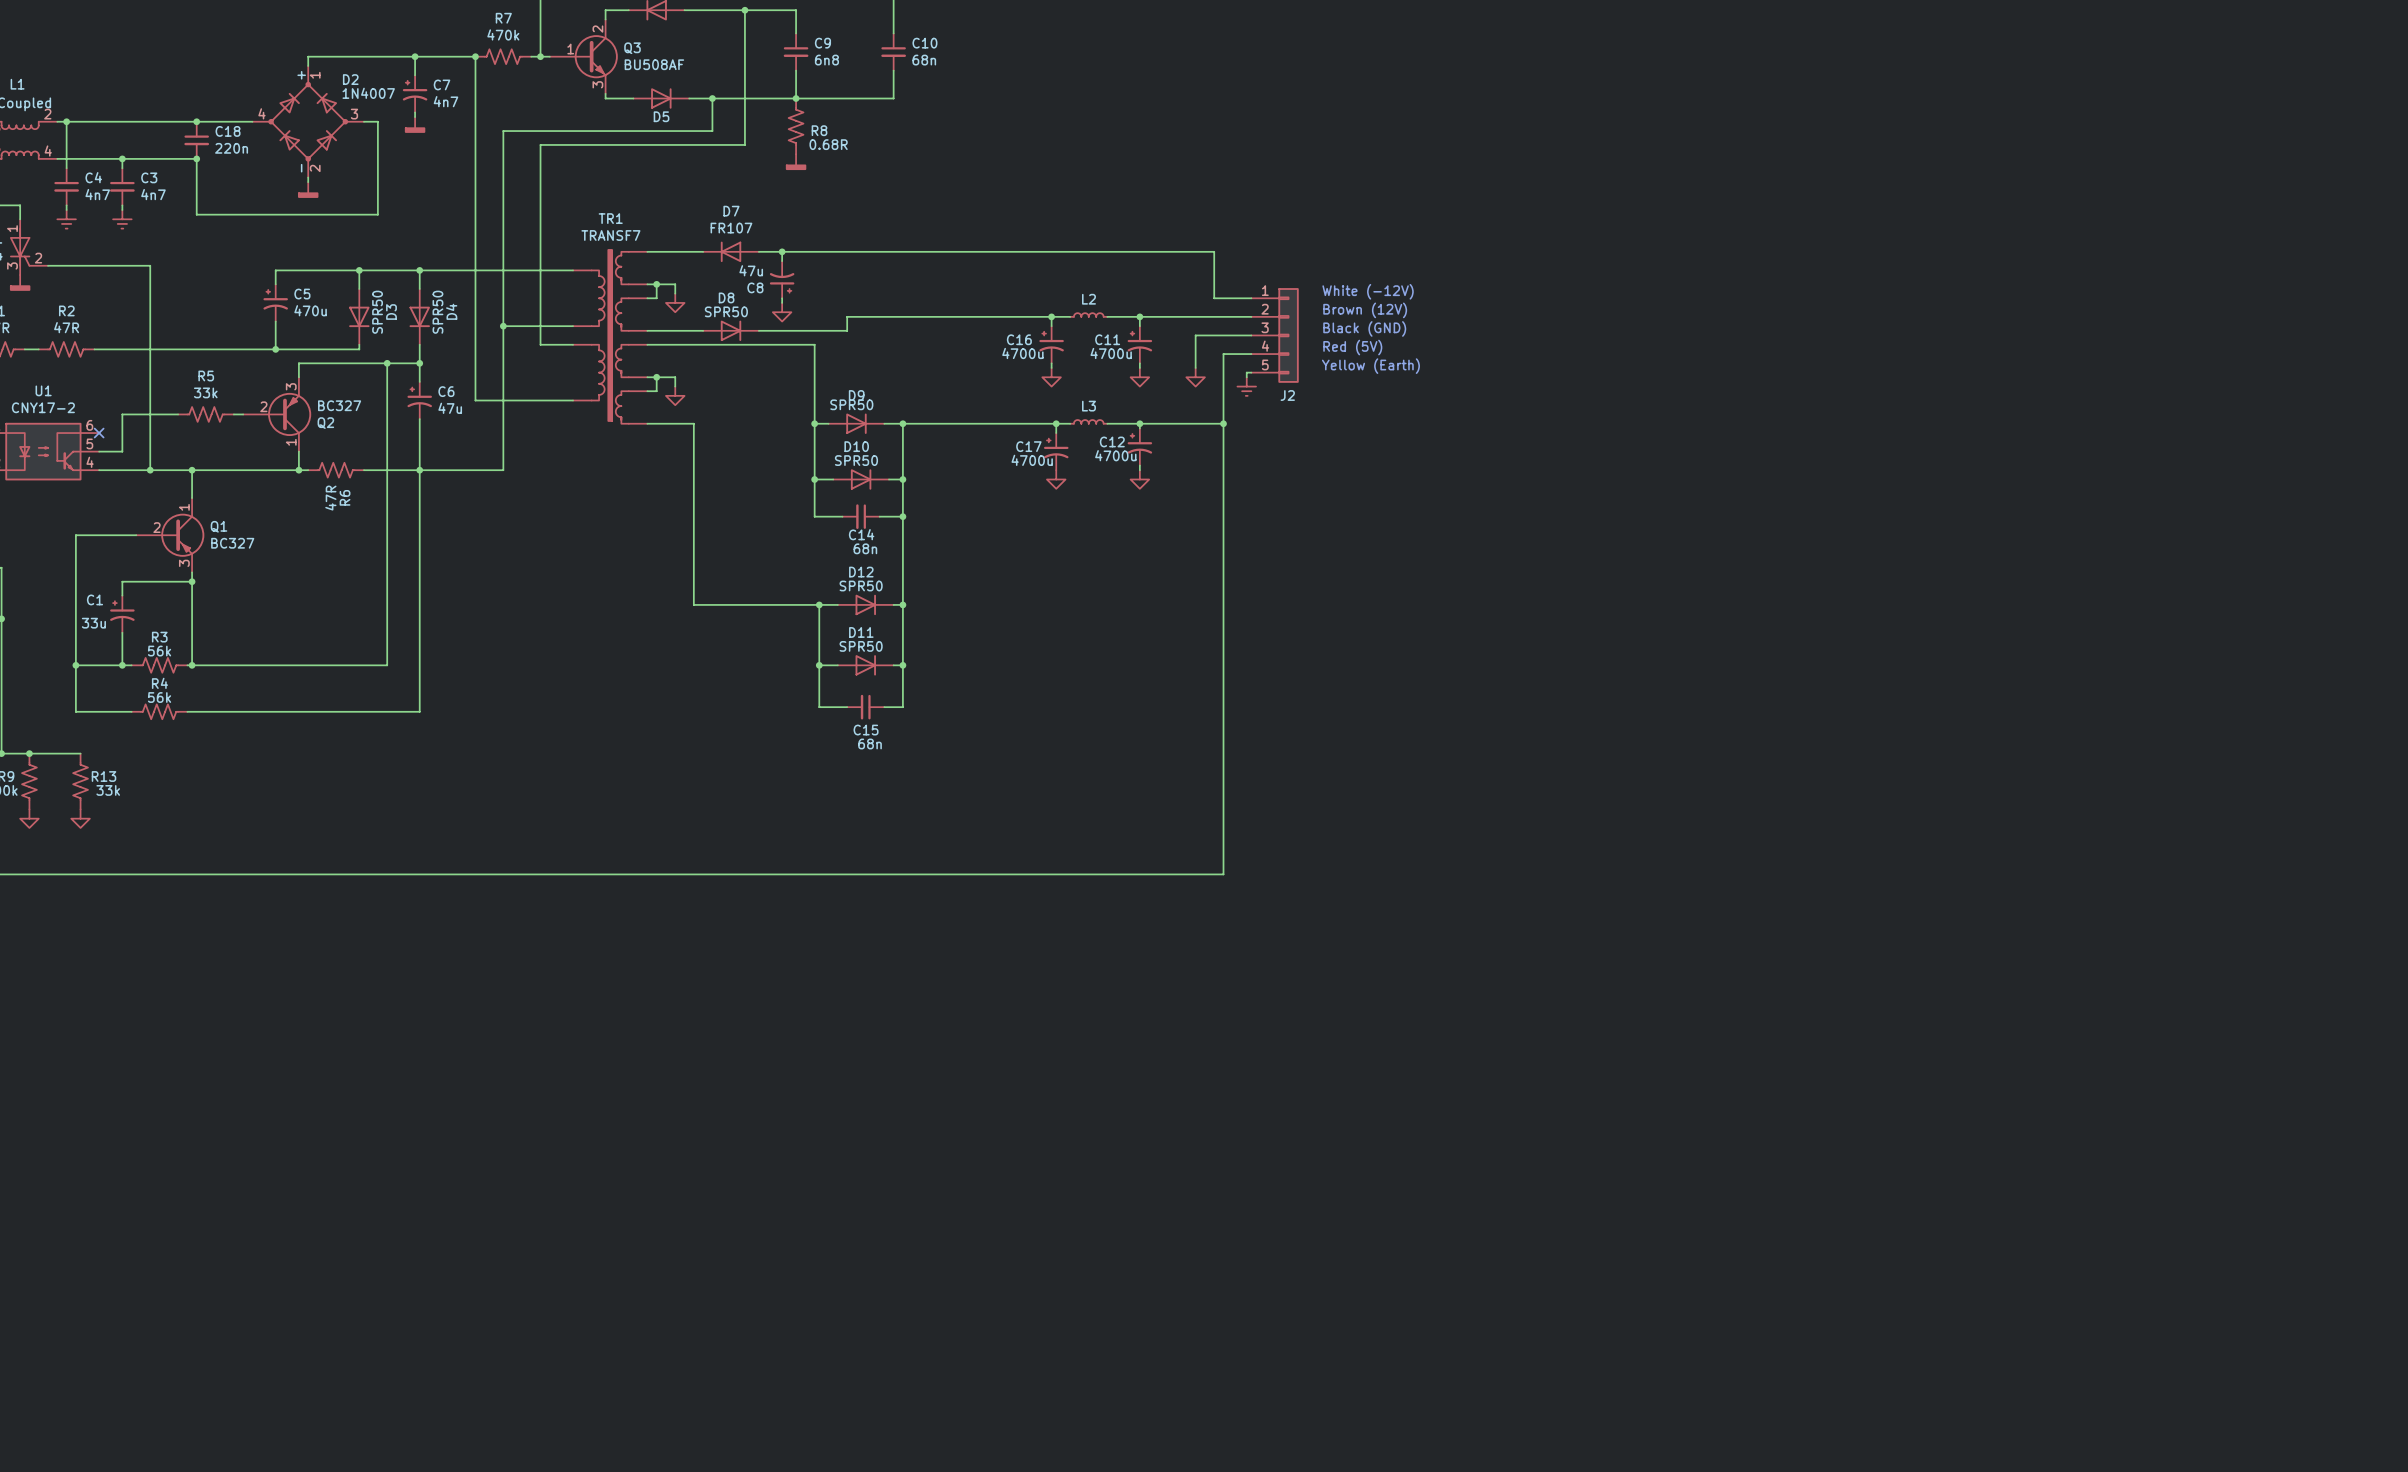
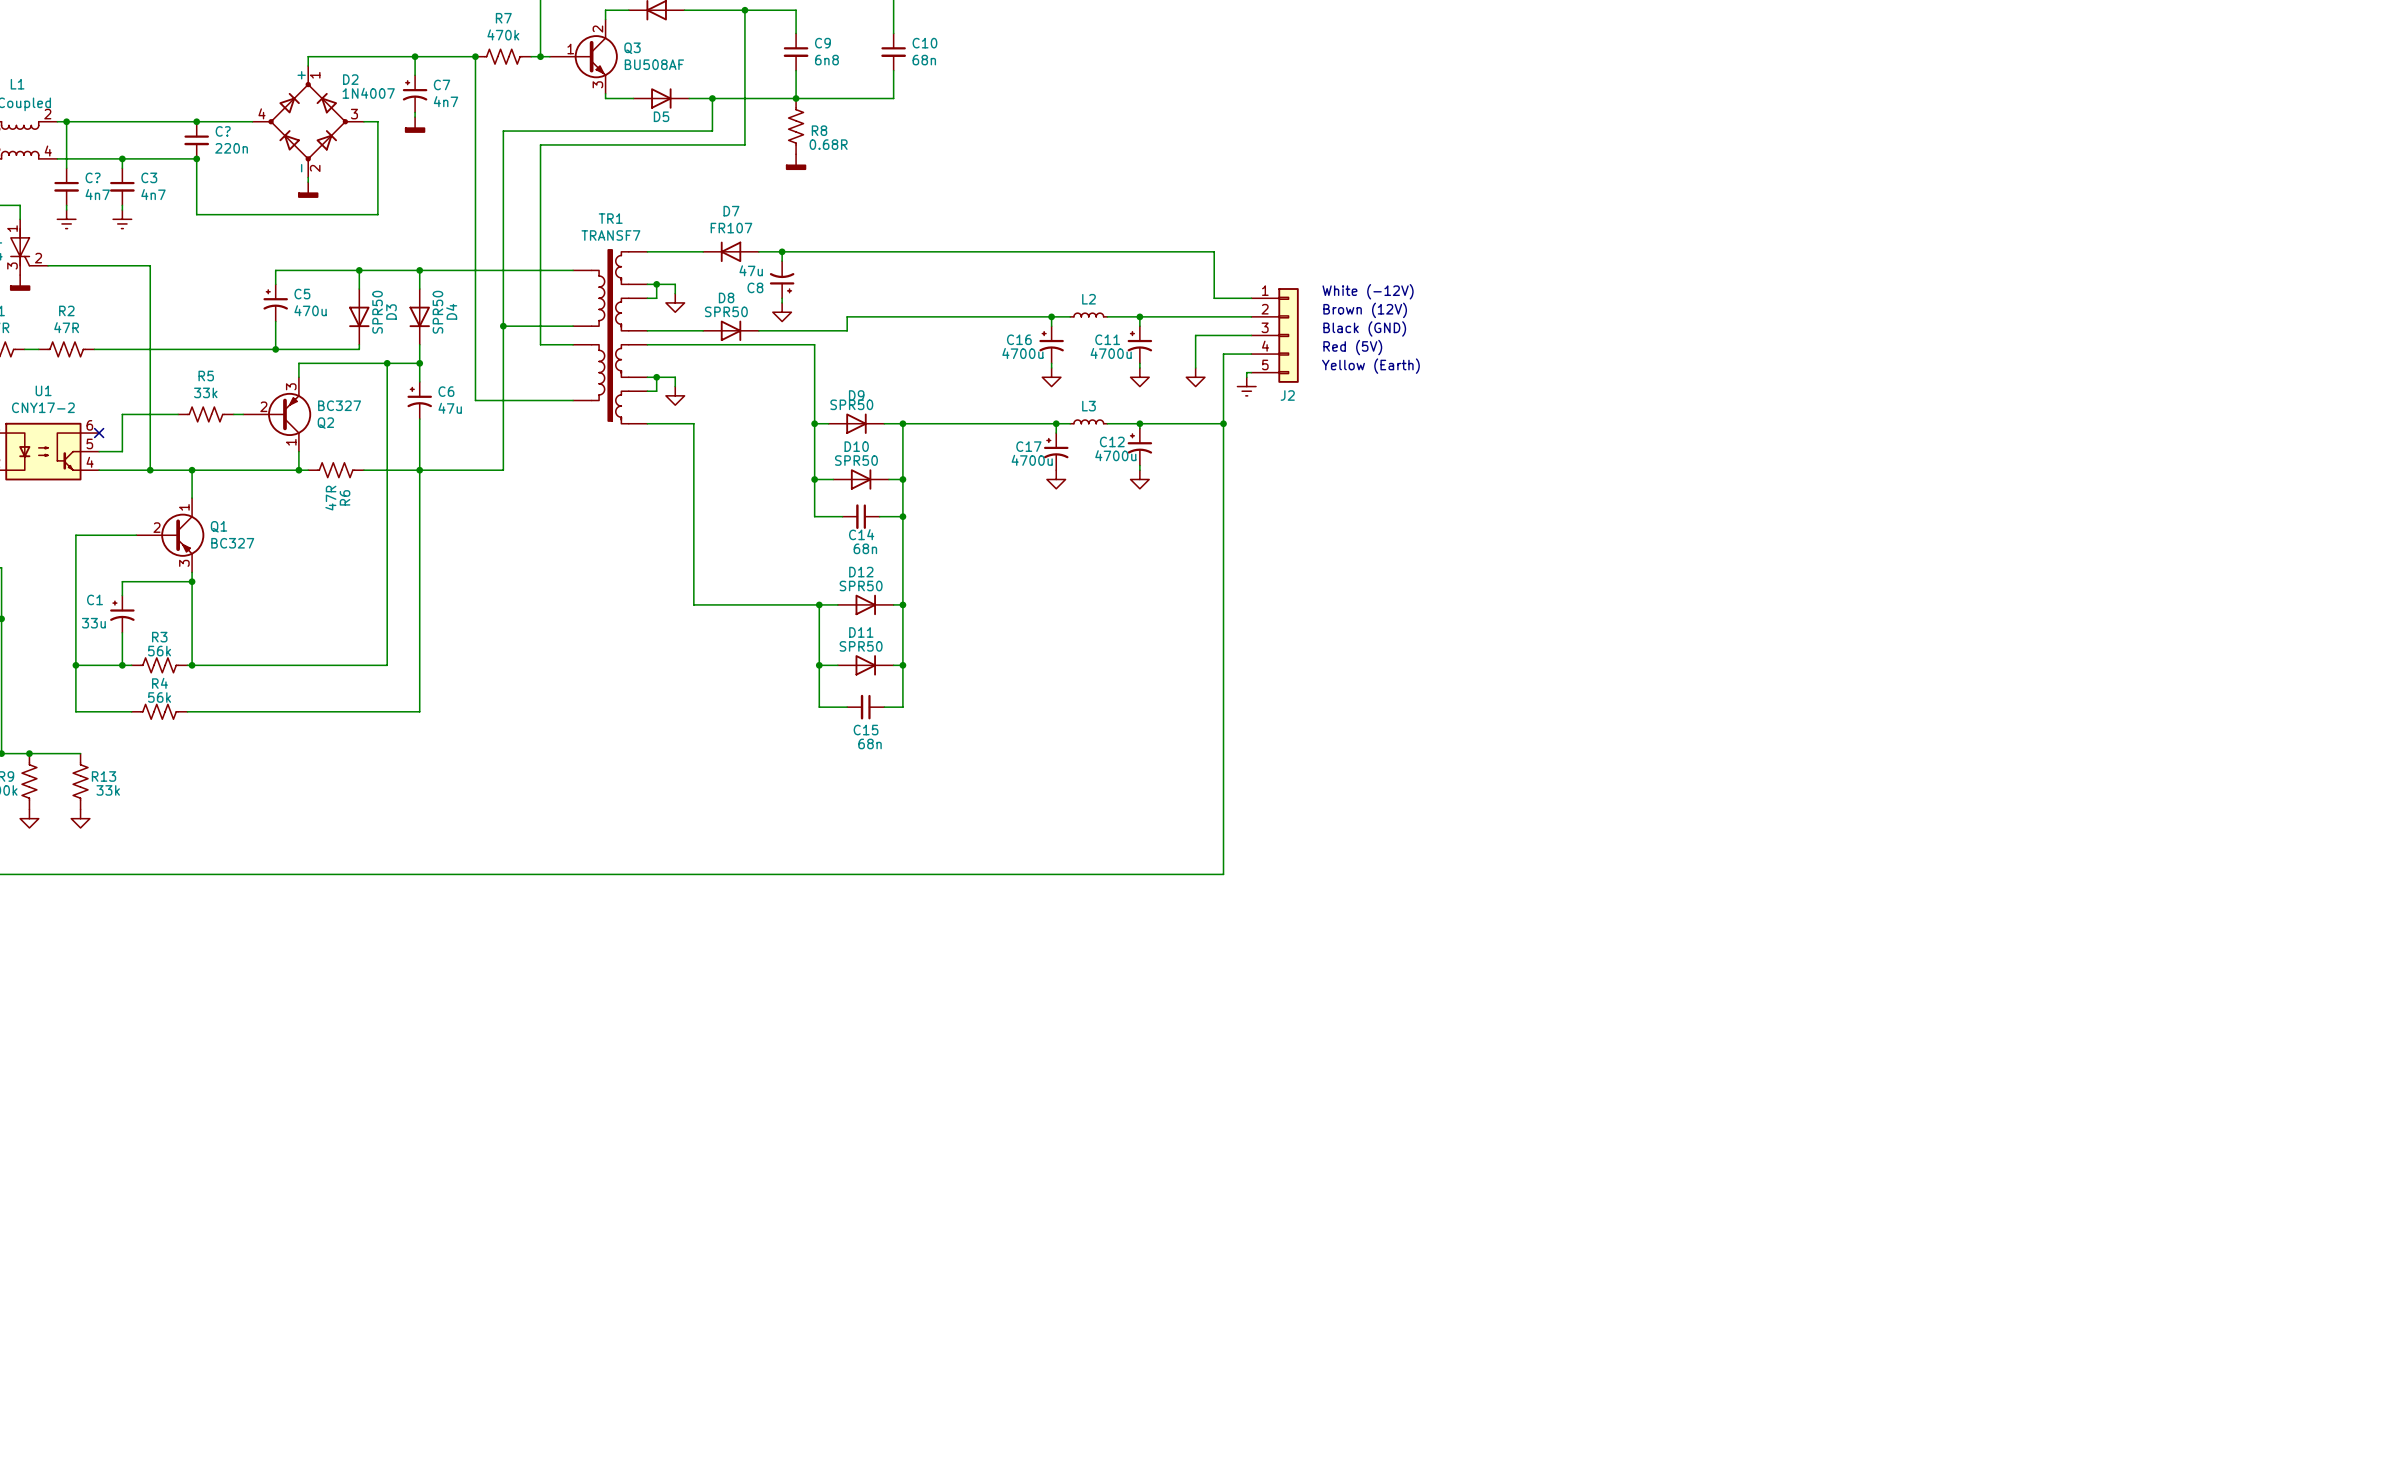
C18 name: C18 (228, 131) -> C? (223, 131)
C4 name: C4 (93, 177) -> C? (93, 177)

